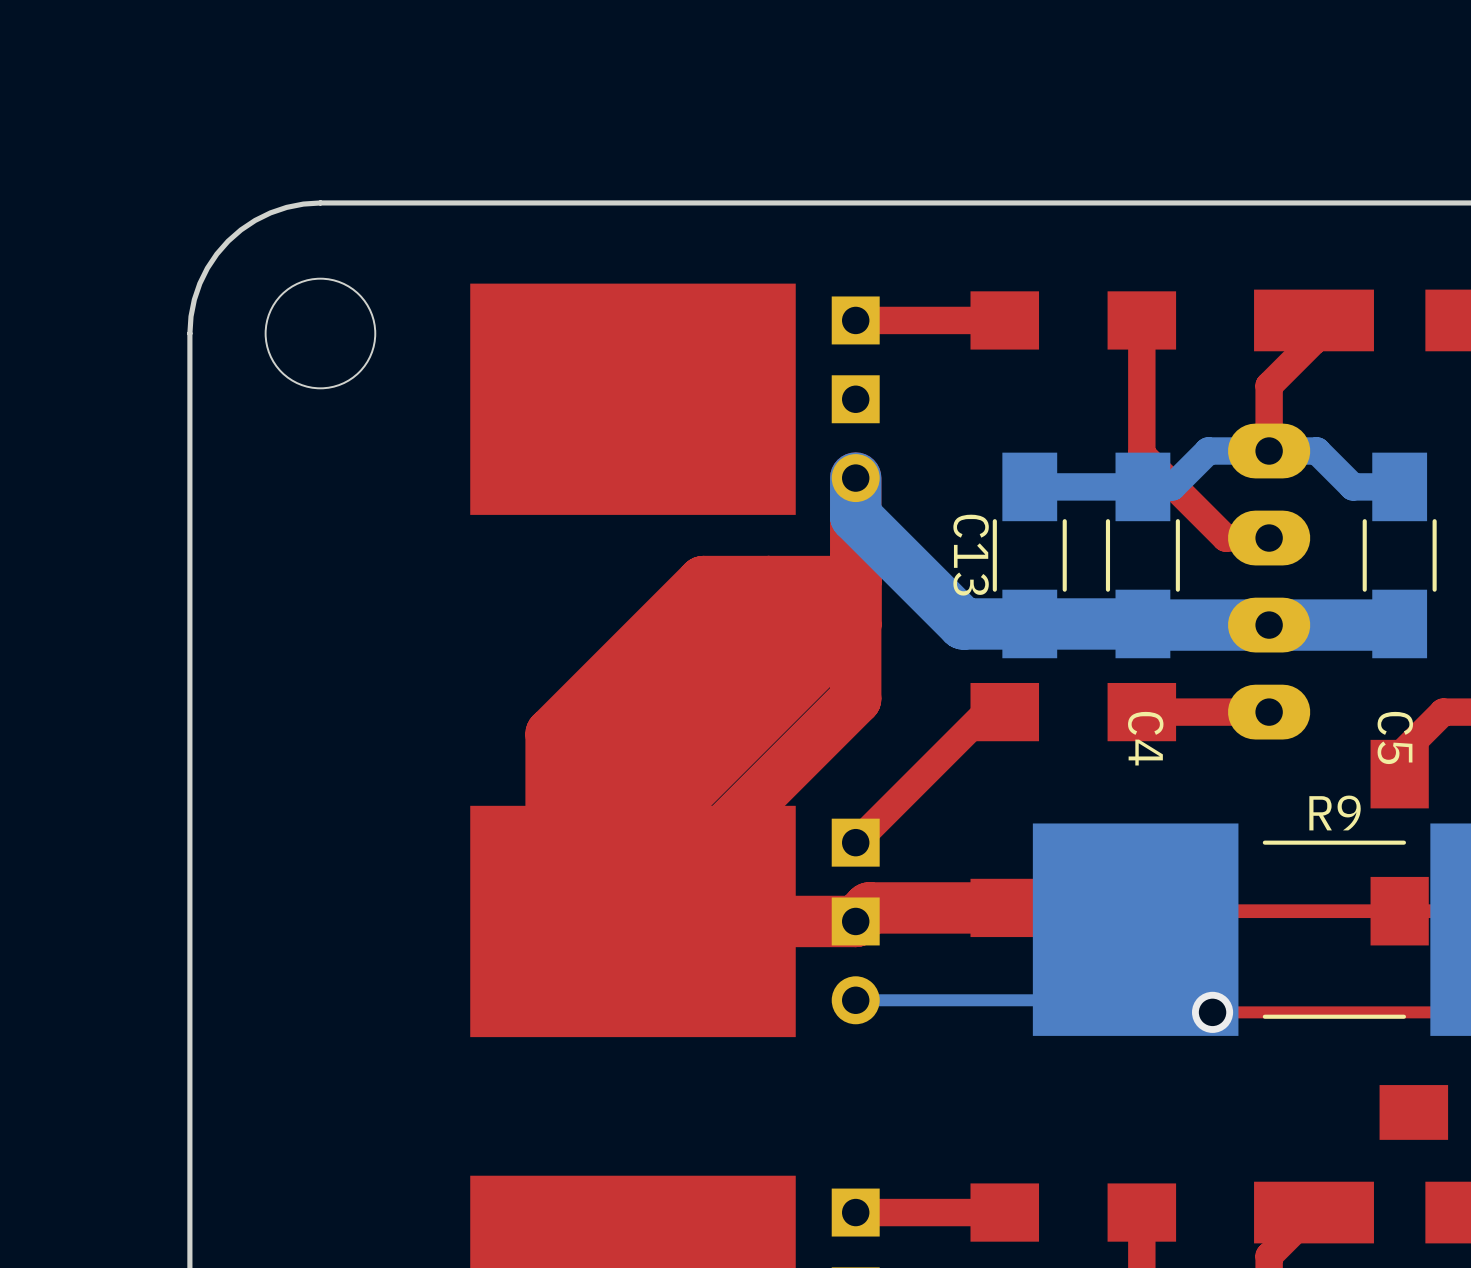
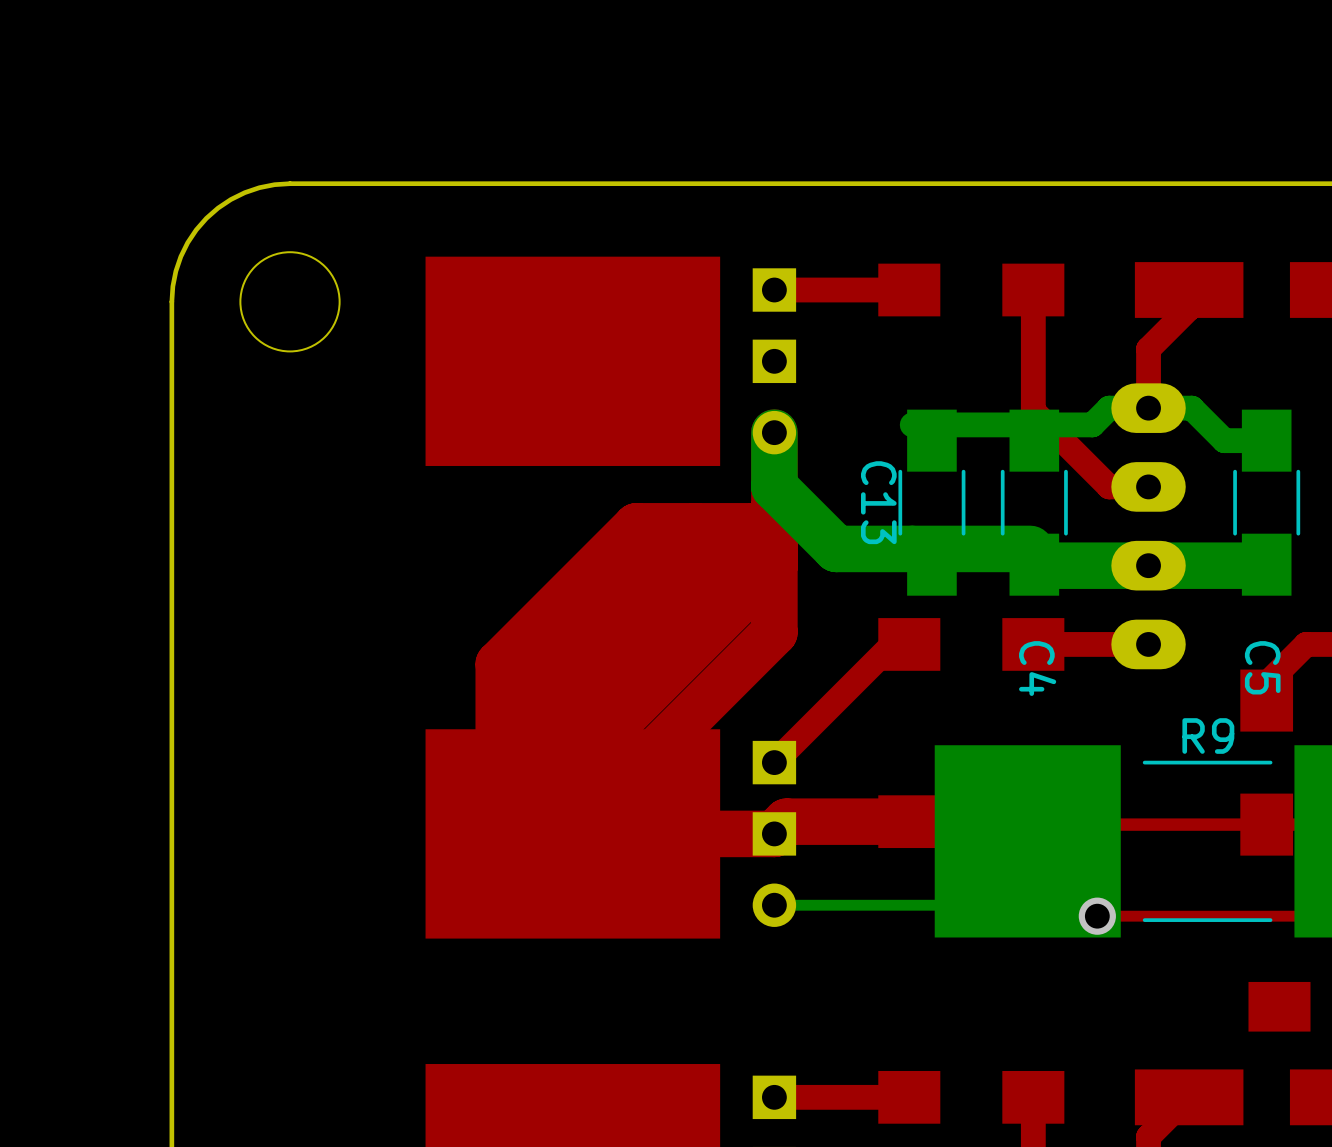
bottom track: (1225, 451) (1208, 451) (1172, 486) (1029, 486) -> (1109, 408) (1092, 424) (912, 424)
bottom track: (855, 516) (963, 623) (1157, 625) -> (774, 467) (774, 486) (836, 548) (1030, 548) (1047, 565)

